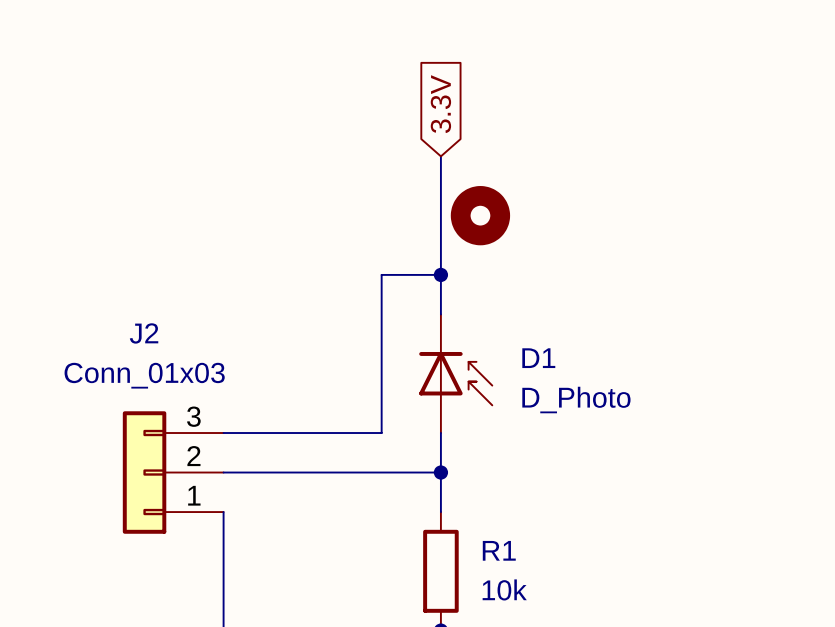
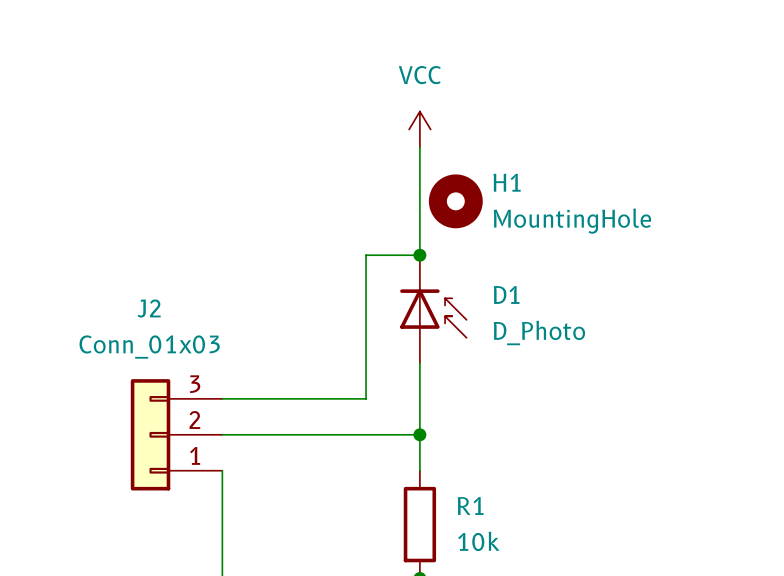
global label: 3.3V (440, 104) -> none
power symbol: none -> VCC (419, 129)
H1 name: none -> H1 (507, 182)
H1 value: none -> MountingHole (572, 221)
D1 position: (455, 373) -> (433, 309)

